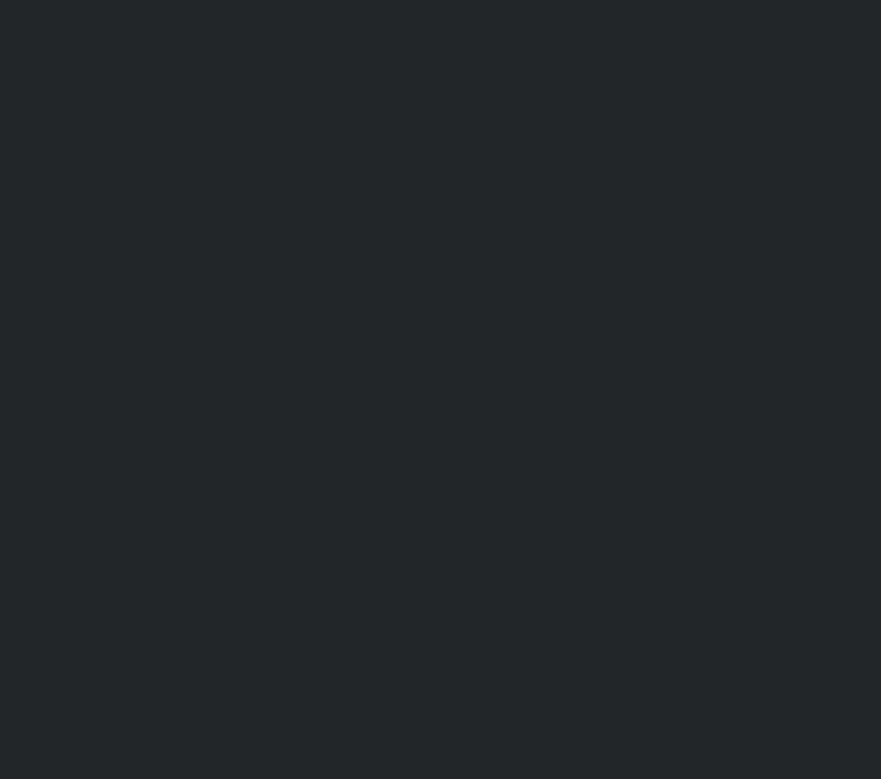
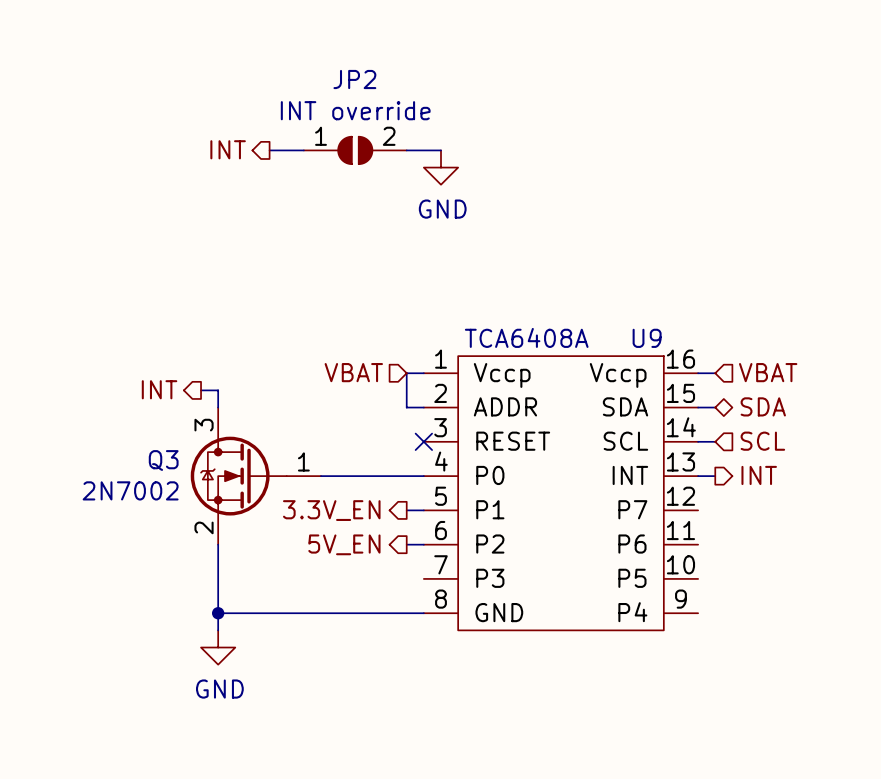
hierarchical label: none -> INT (228, 149)
wire: none -> (269, 150) (303, 150)
JP2: none -> INT override (355, 150)
wire: none -> (406, 150) (441, 150)
power symbol: none -> GND (441, 167)
hierarchical label: none -> VBAT (353, 372)
hierarchical label: none -> VBAT (768, 372)
wire: none -> (423, 373) (406, 373) (406, 407) (423, 407)
wire: none -> (698, 373) (715, 373)
hierarchical label: none -> INT (159, 389)
wire: none -> (201, 390) (218, 390) (218, 407)
hierarchical label: none -> SDA (763, 406)
wire: none -> (698, 407) (715, 407)
no-connect mark: none -> (423, 441)
wire: none -> (698, 441) (715, 441)
hierarchical label: none -> SCL (762, 441)
hierarchical label: none -> INT (759, 475)
Q3: none -> 2N7002 (255, 476)
wire: none -> (321, 476) (423, 476)
wire: none -> (698, 476) (715, 476)
U9: none -> TCA6408A (560, 493)
hierarchical label: none -> 3.3V_EN (331, 510)
wire: none -> (406, 510) (423, 510)
wire: none -> (218, 544) (218, 630)
hierarchical label: none -> 5V_EN (344, 544)
wire: none -> (406, 544) (423, 544)
wire: none -> (218, 613) (423, 613)
junction: none -> (218, 613)
power symbol: none -> GND (218, 647)

